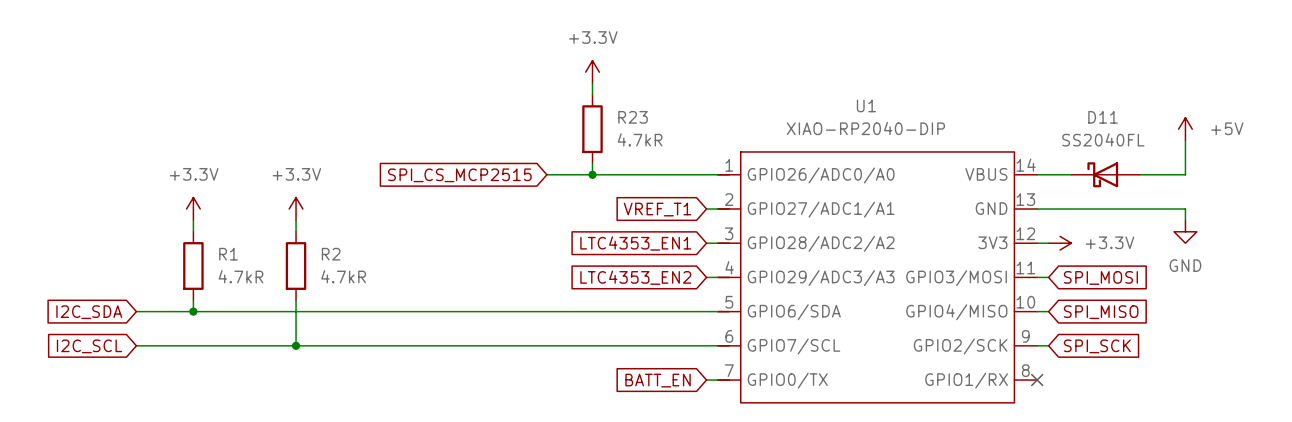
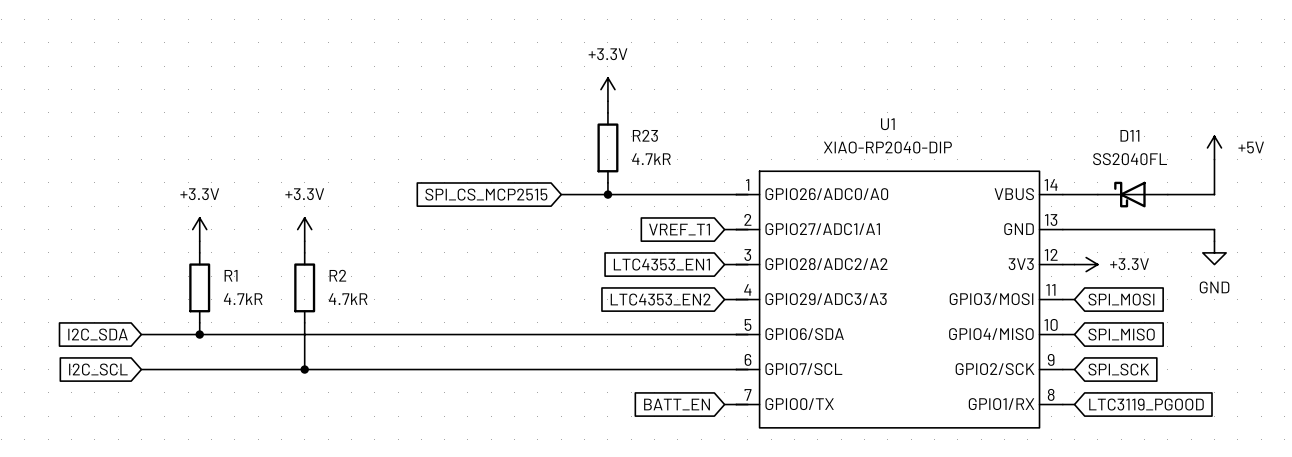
wire: none -> (1062, 404) (1074, 404)
no-connect mark: (1037, 380) -> none
global label: none -> LTC3119_PGOOD (1146, 404)

